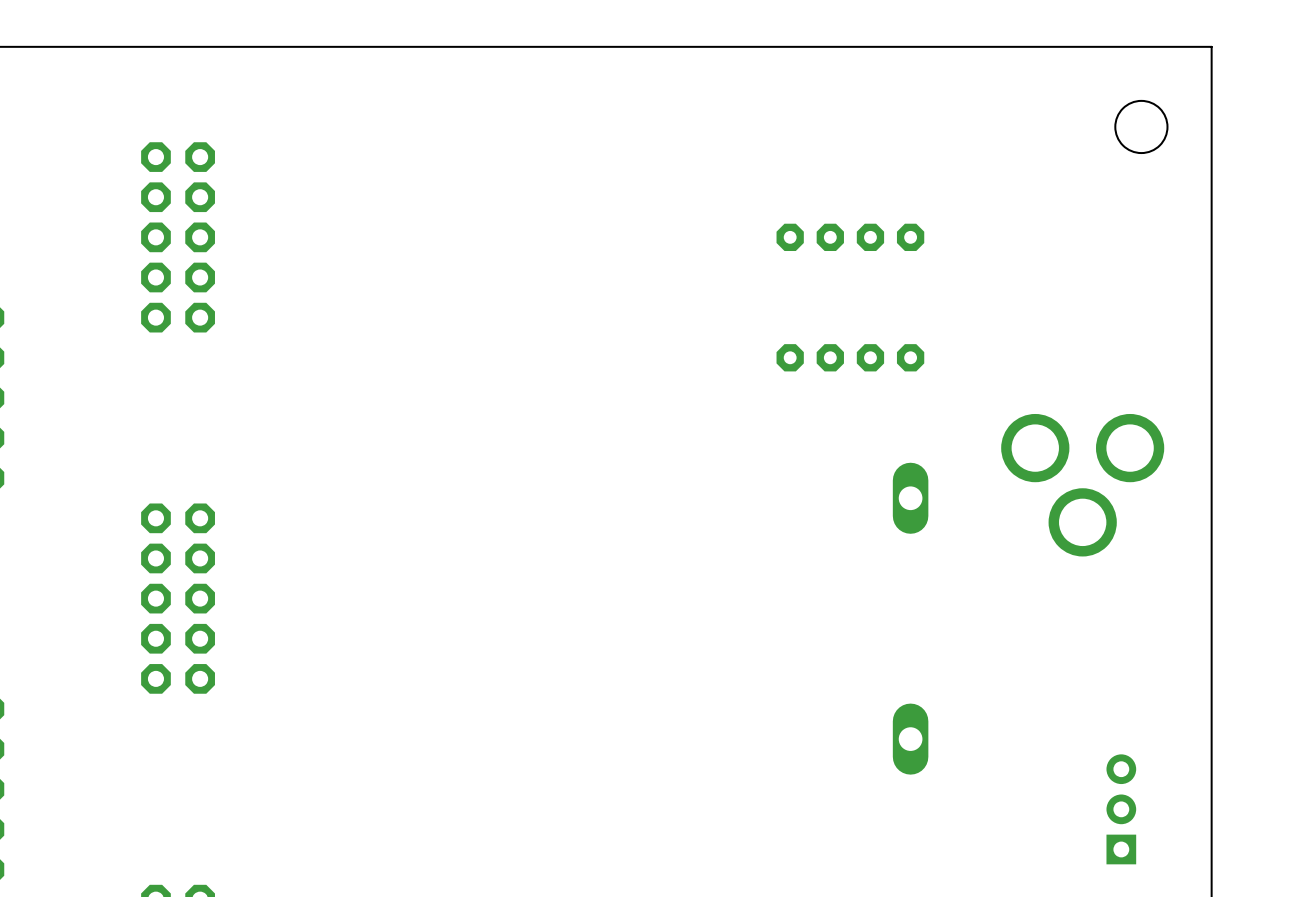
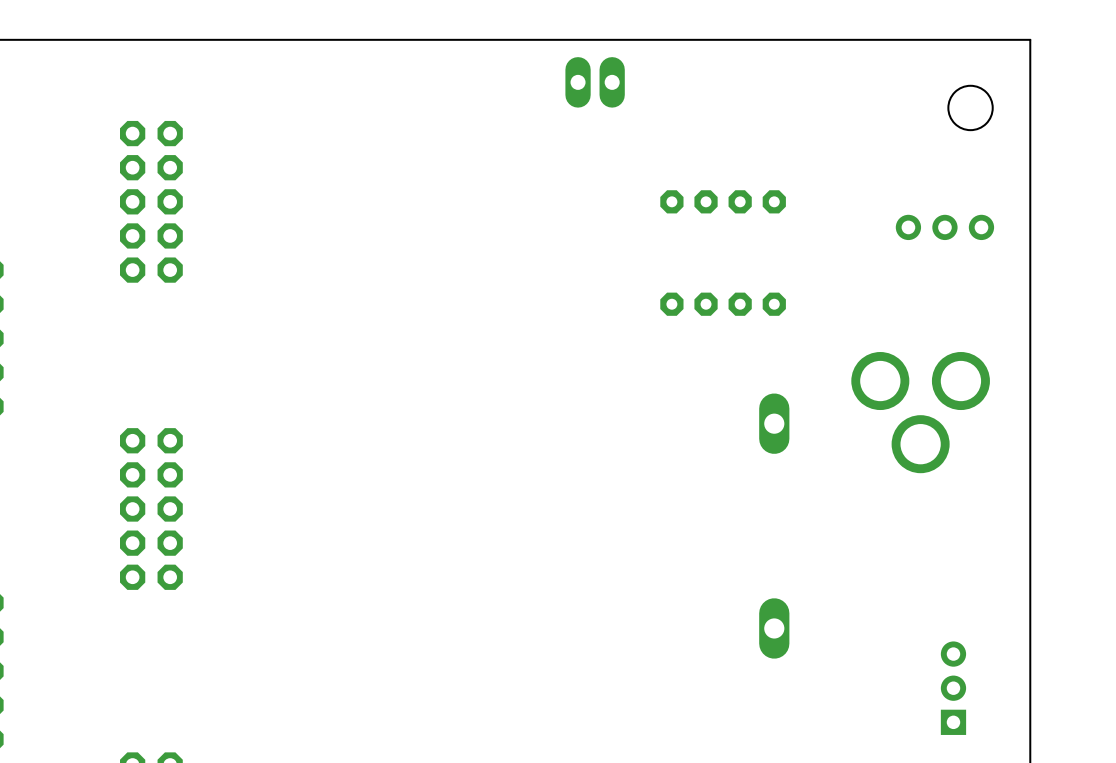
part: none -> (595, 82)
part: none -> (944, 227)

